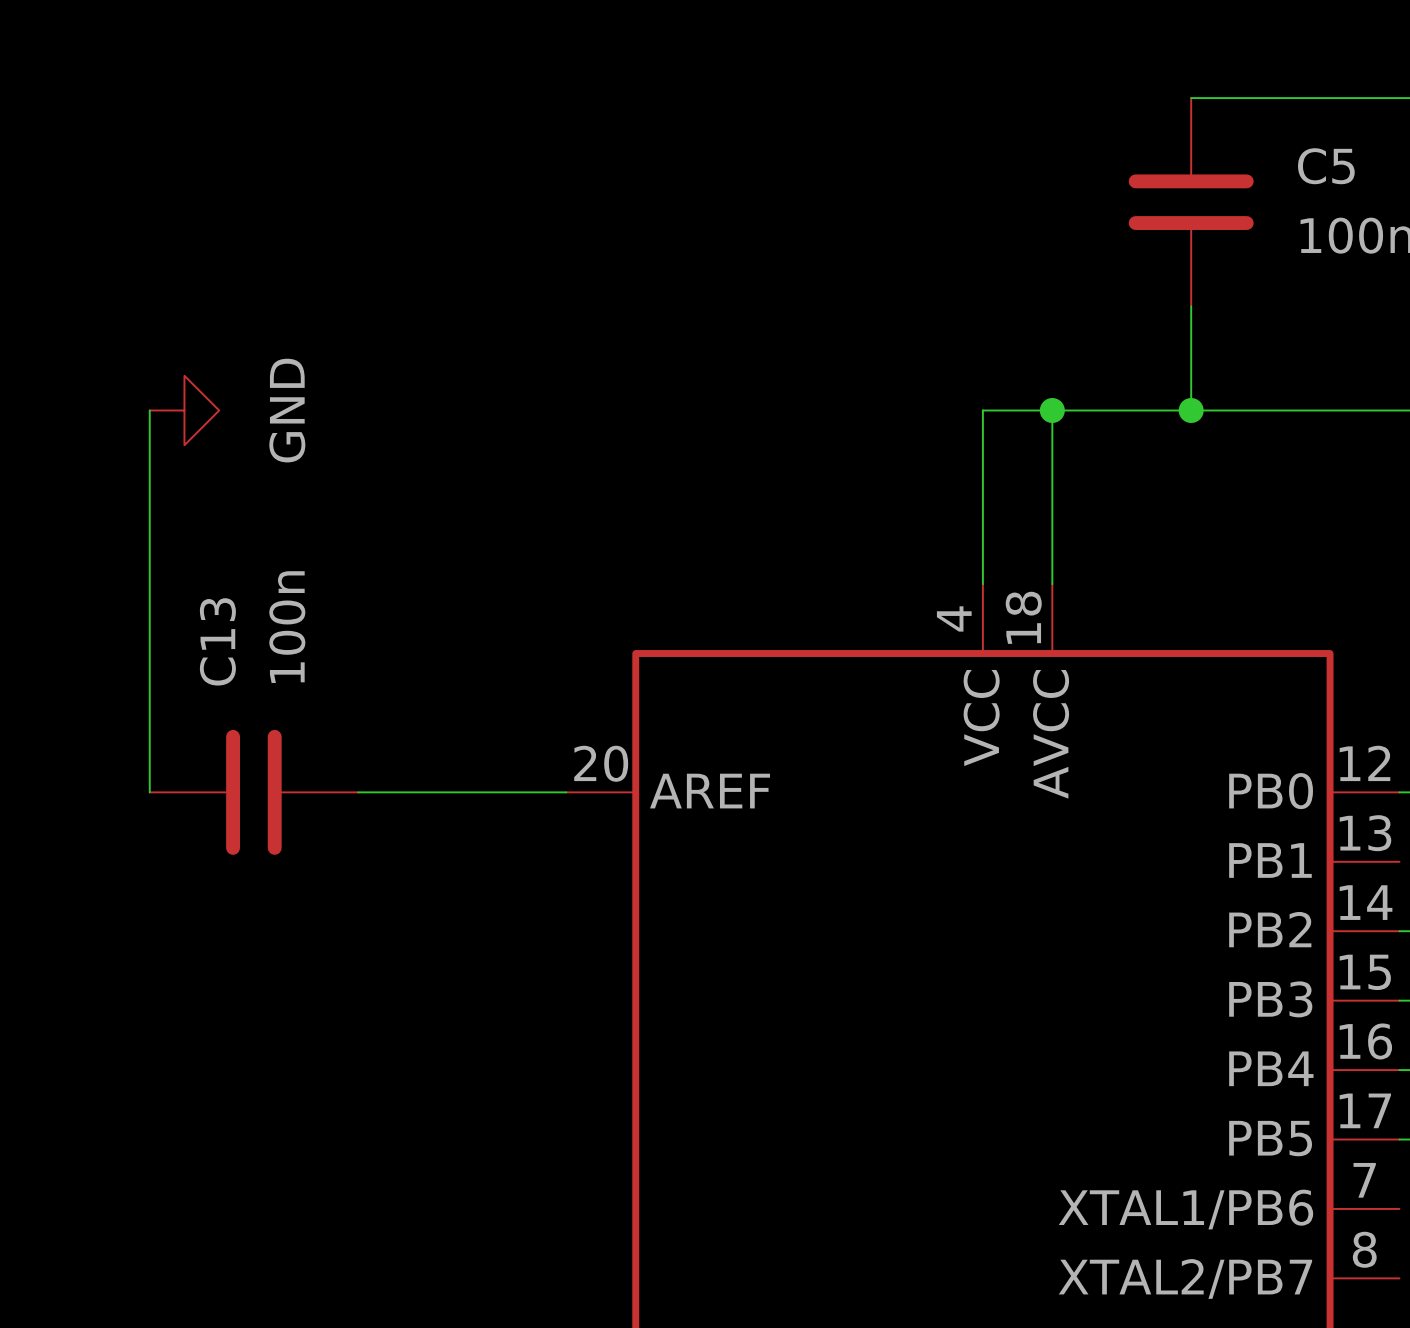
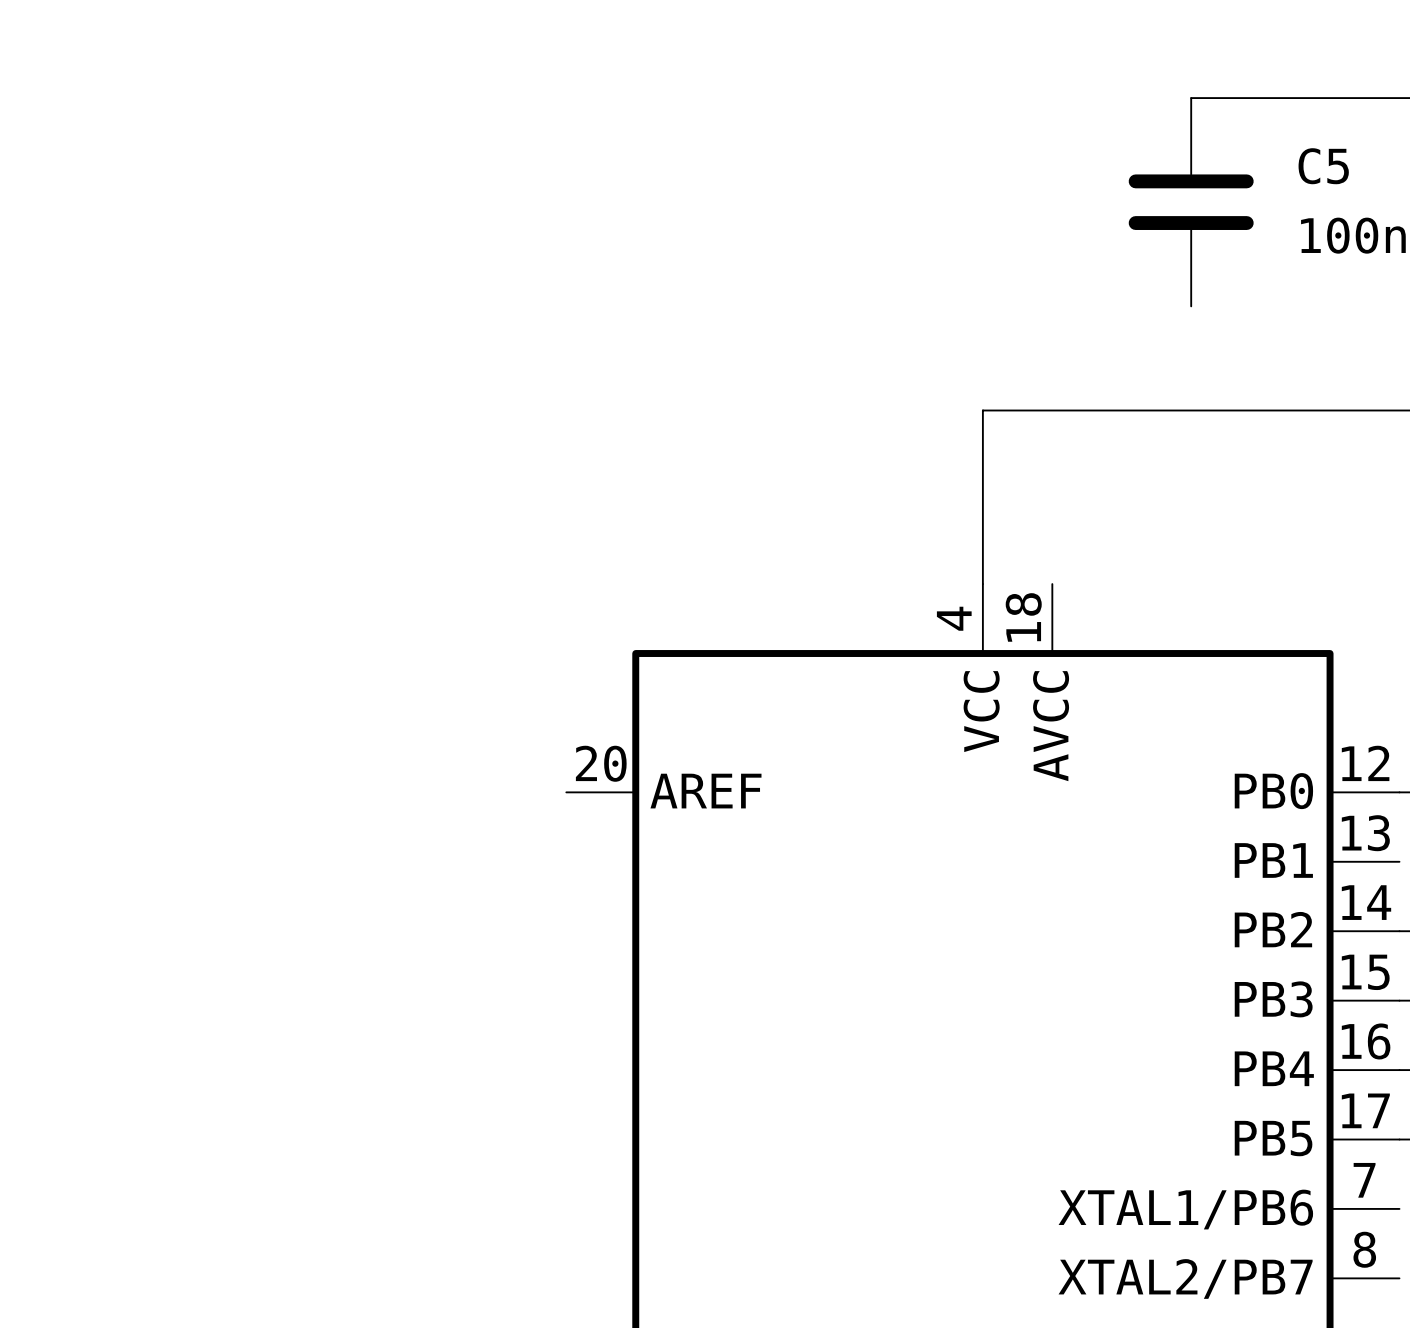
wire: (1191, 306) (1191, 410) -> none
wire: (149, 410) (149, 792) -> none
power symbol: GND (184, 410) -> none
wire: (1052, 410) (1052, 584) -> none
junction: (1052, 410) -> none
junction: (1191, 410) -> none
C13: 100n (253, 792) -> none
wire: (358, 792) (566, 792) -> none

